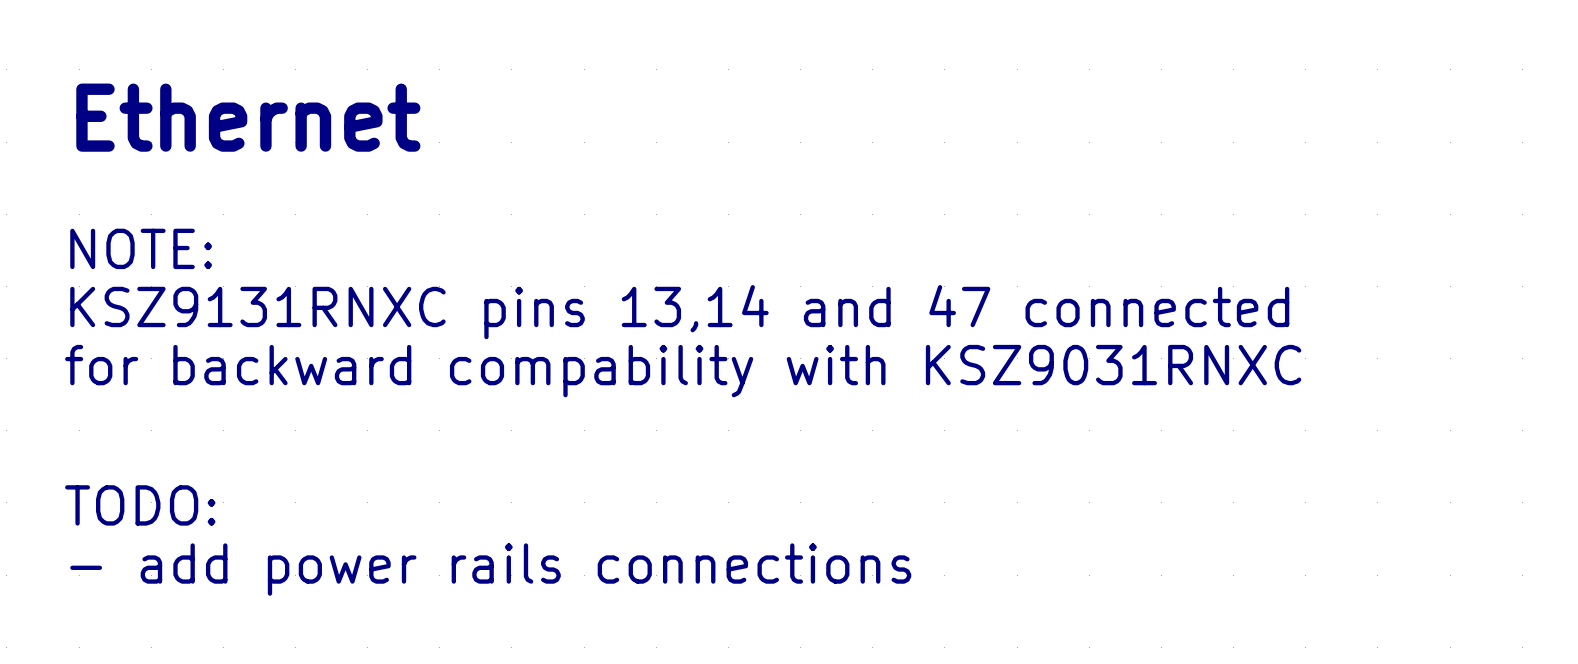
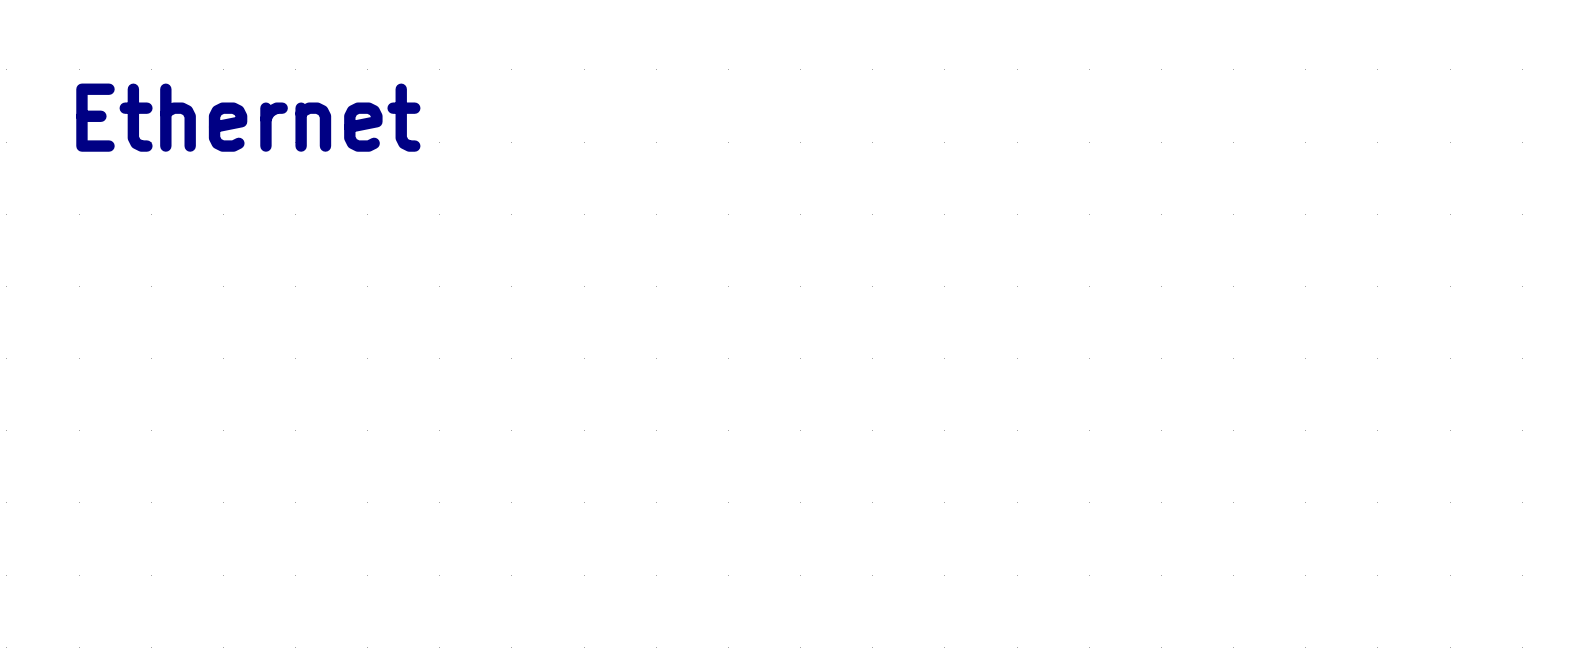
text: NOTE: (141, 248) -> none
text: KSZ9131RNXC pins 13,14 and 47 connected (679, 312) -> none
text: for backward compability with KSZ9031RNXC (683, 371) -> none
text: TODO: (140, 505) -> none
text: - add power rails connections (490, 569) -> none

